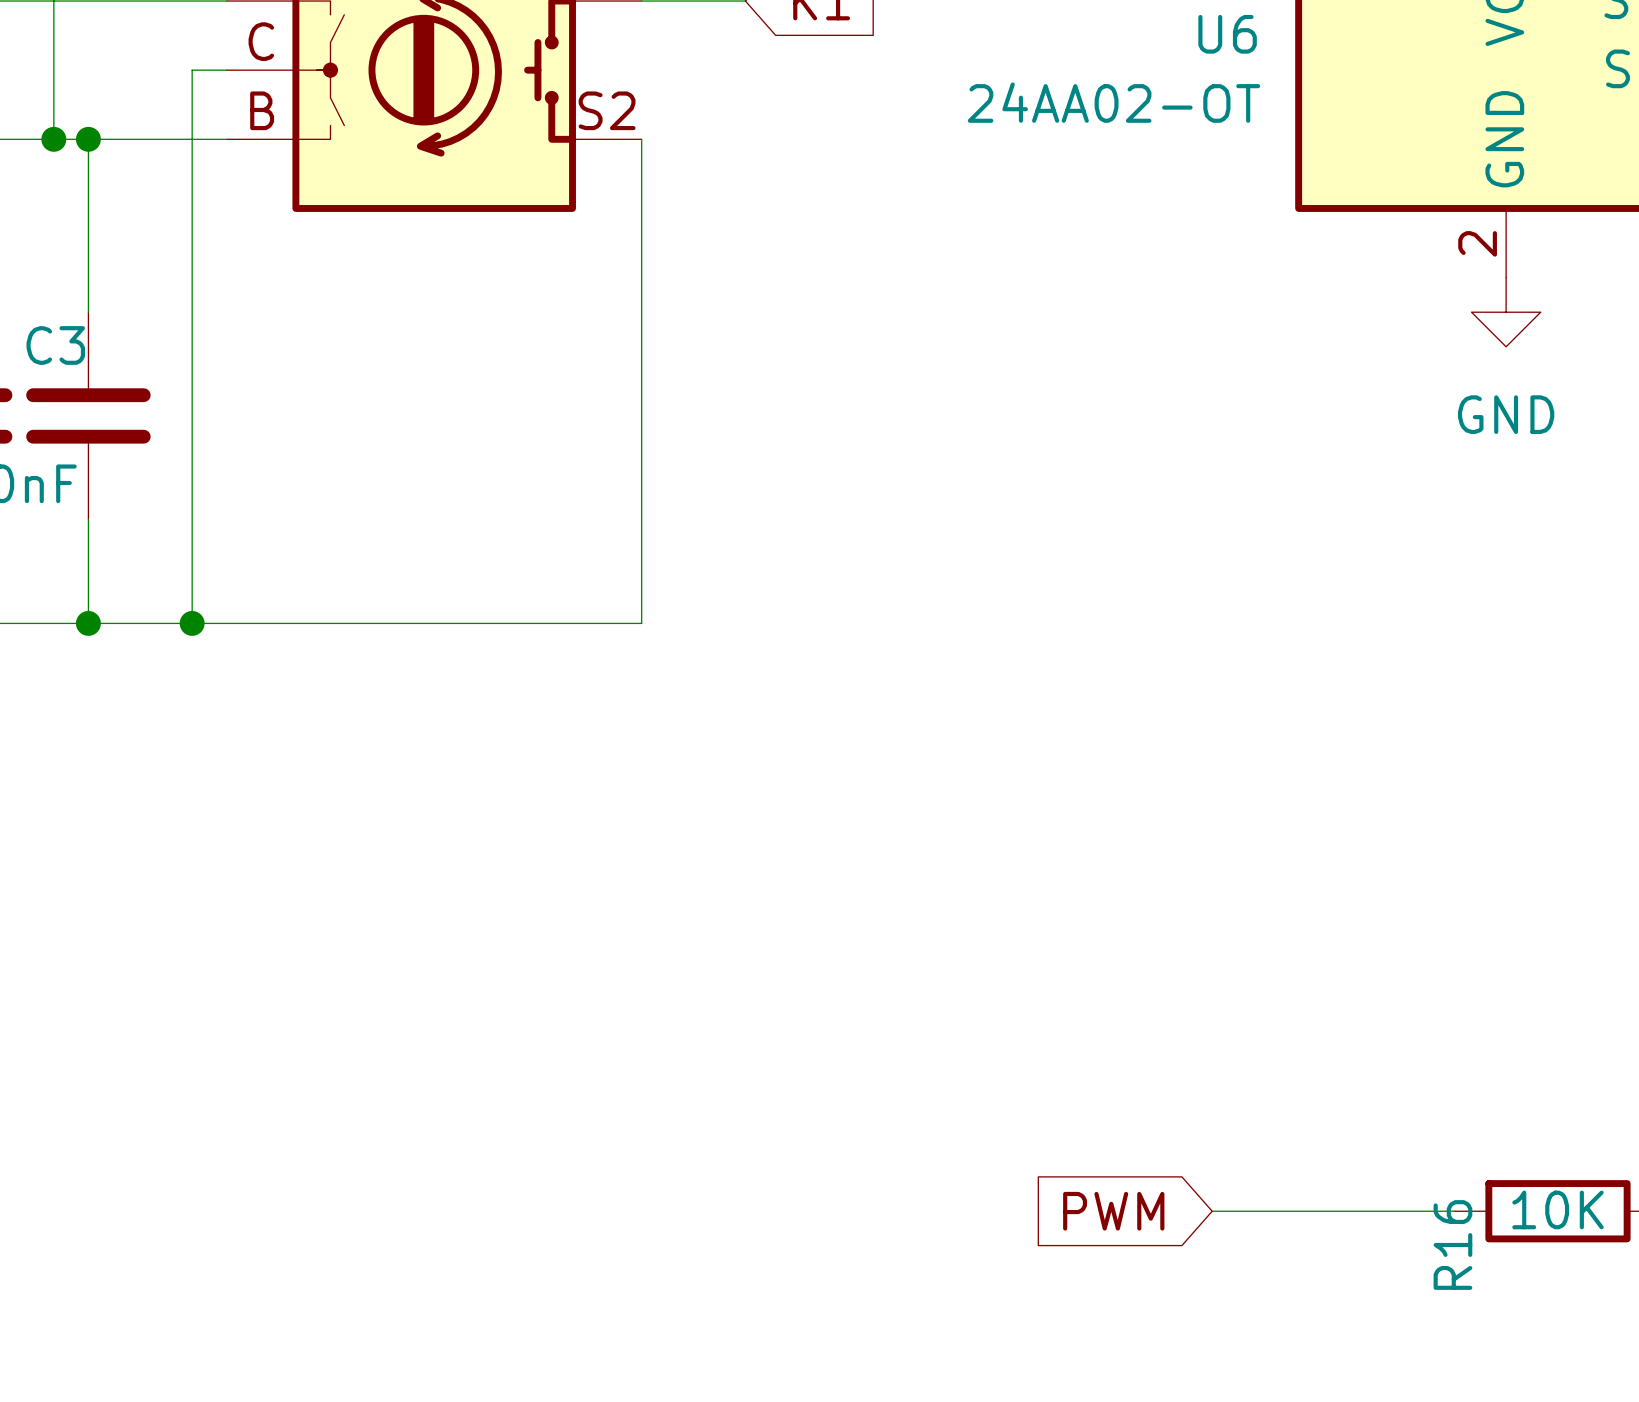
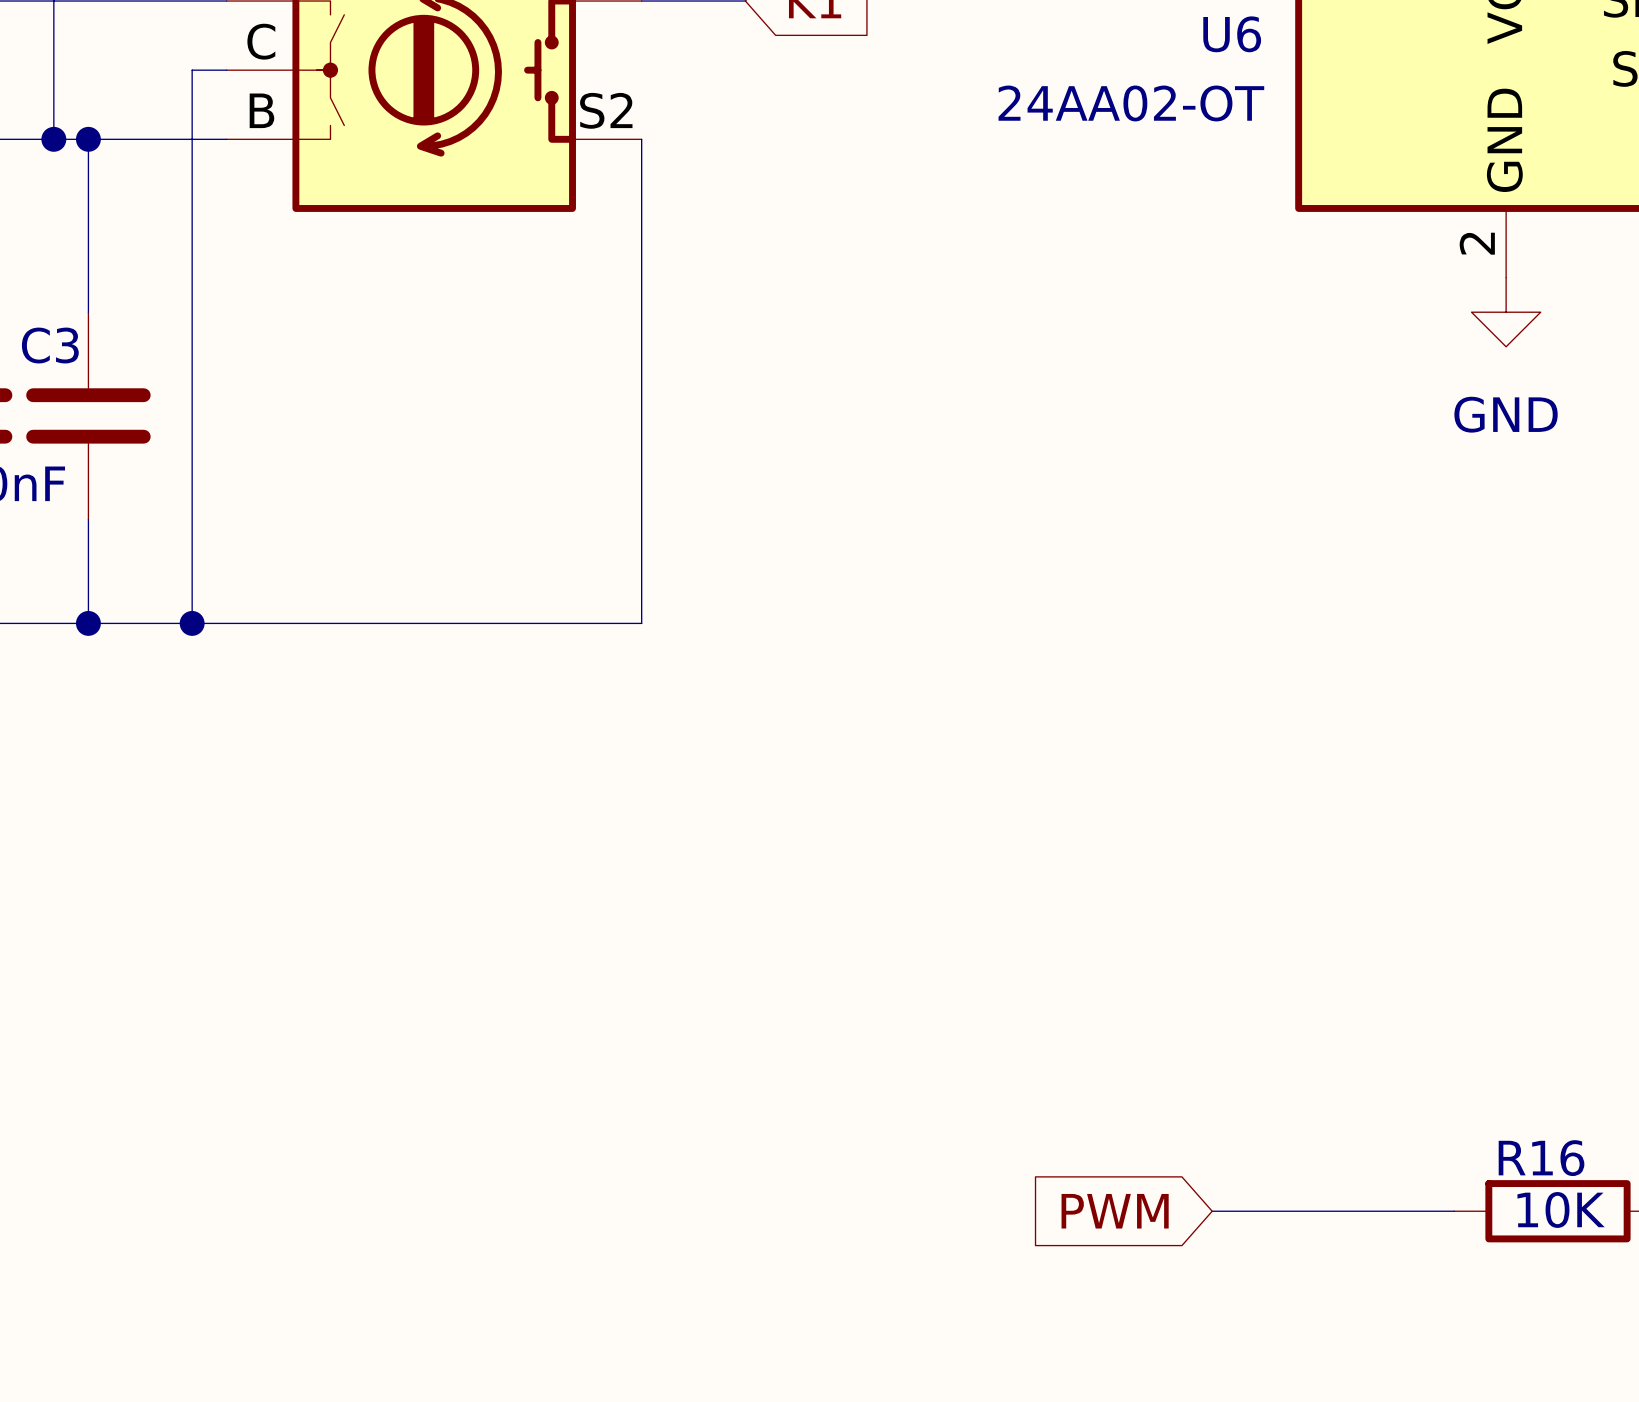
R16 name rotation: 0° (1452, 1244) -> 90° clockwise (1541, 1158)
R16 name position: R16 (1452, 1244) -> R16 (1541, 1158)

